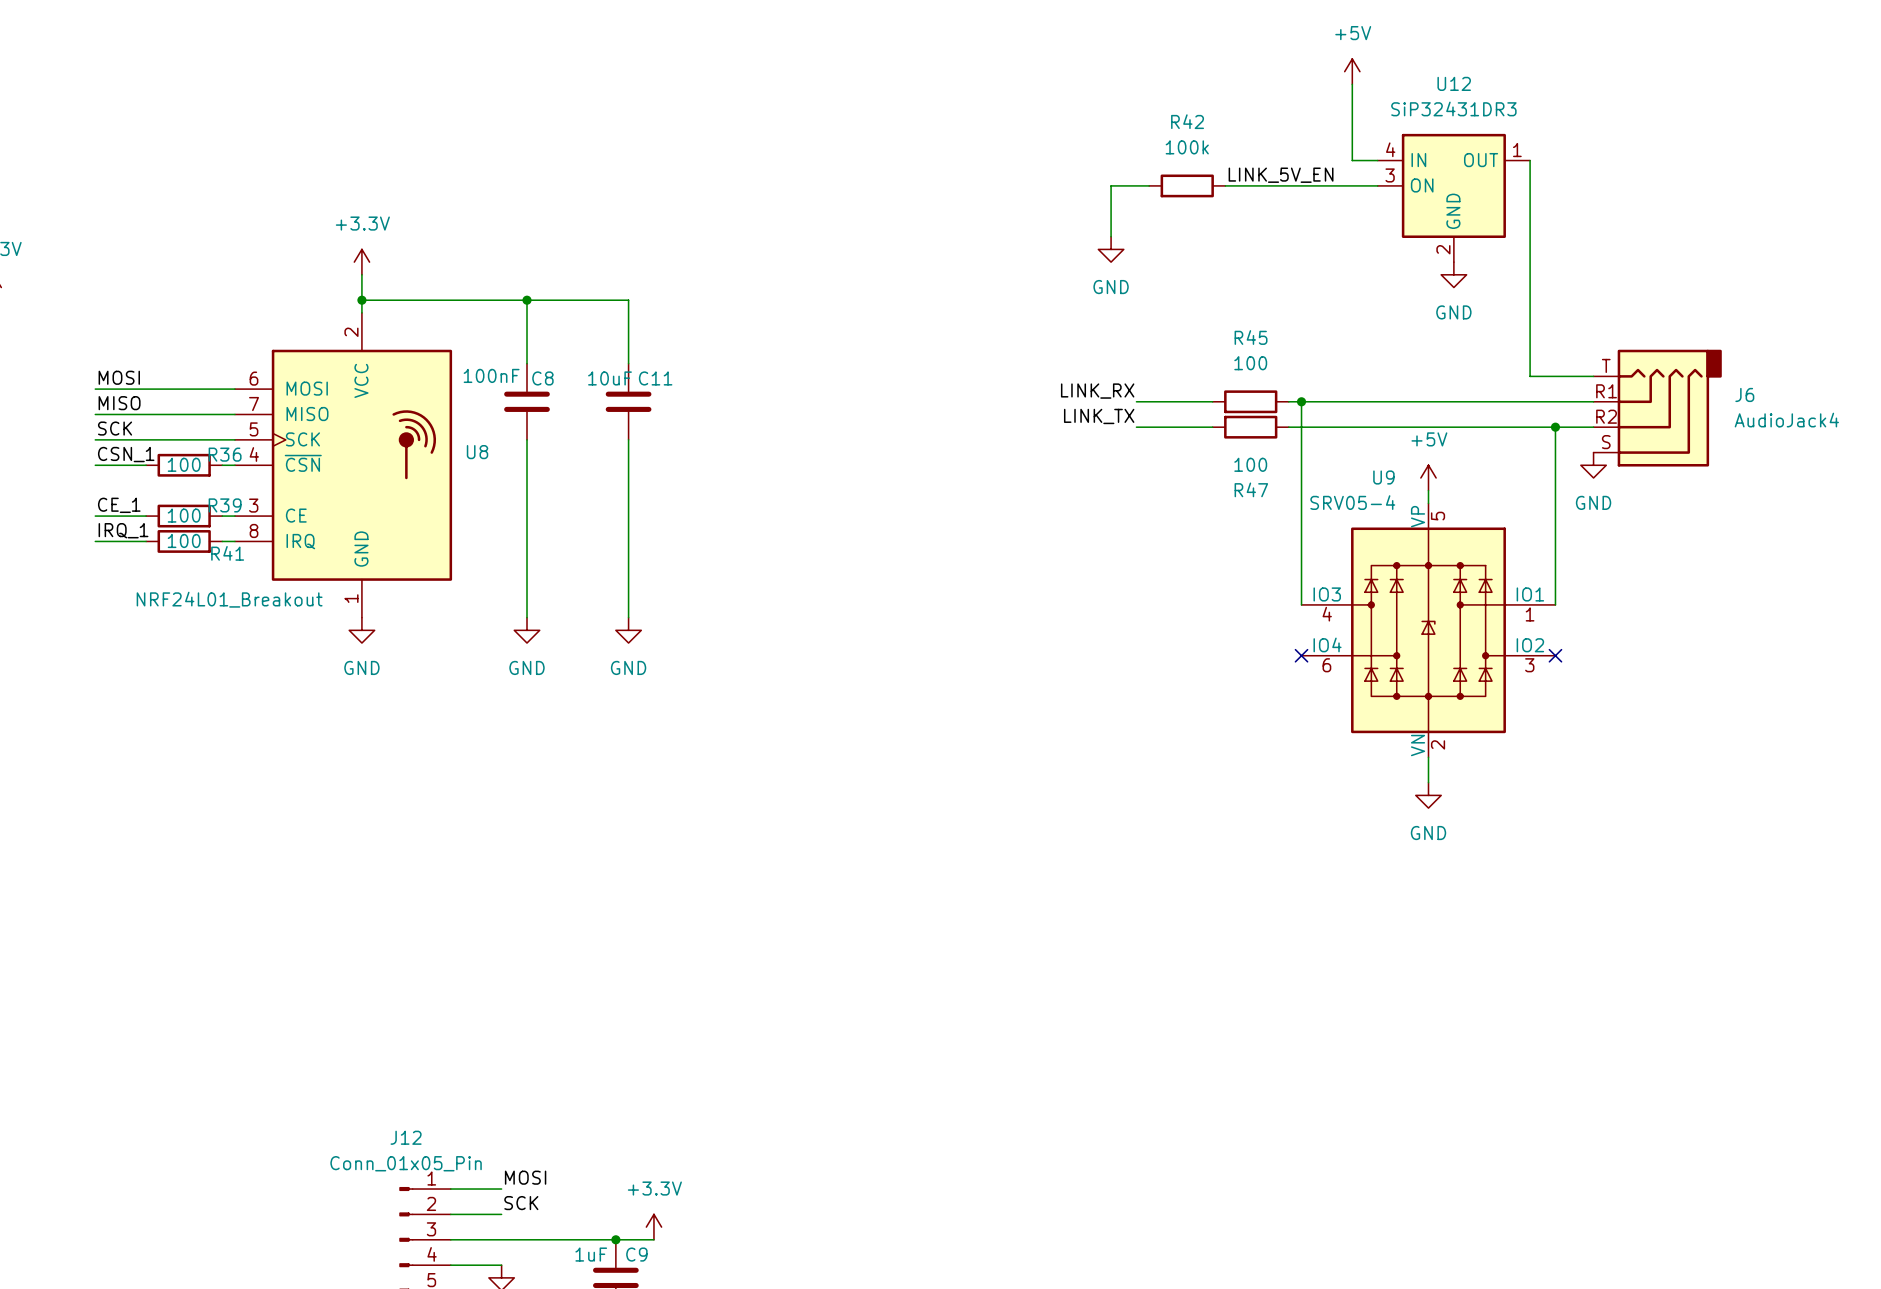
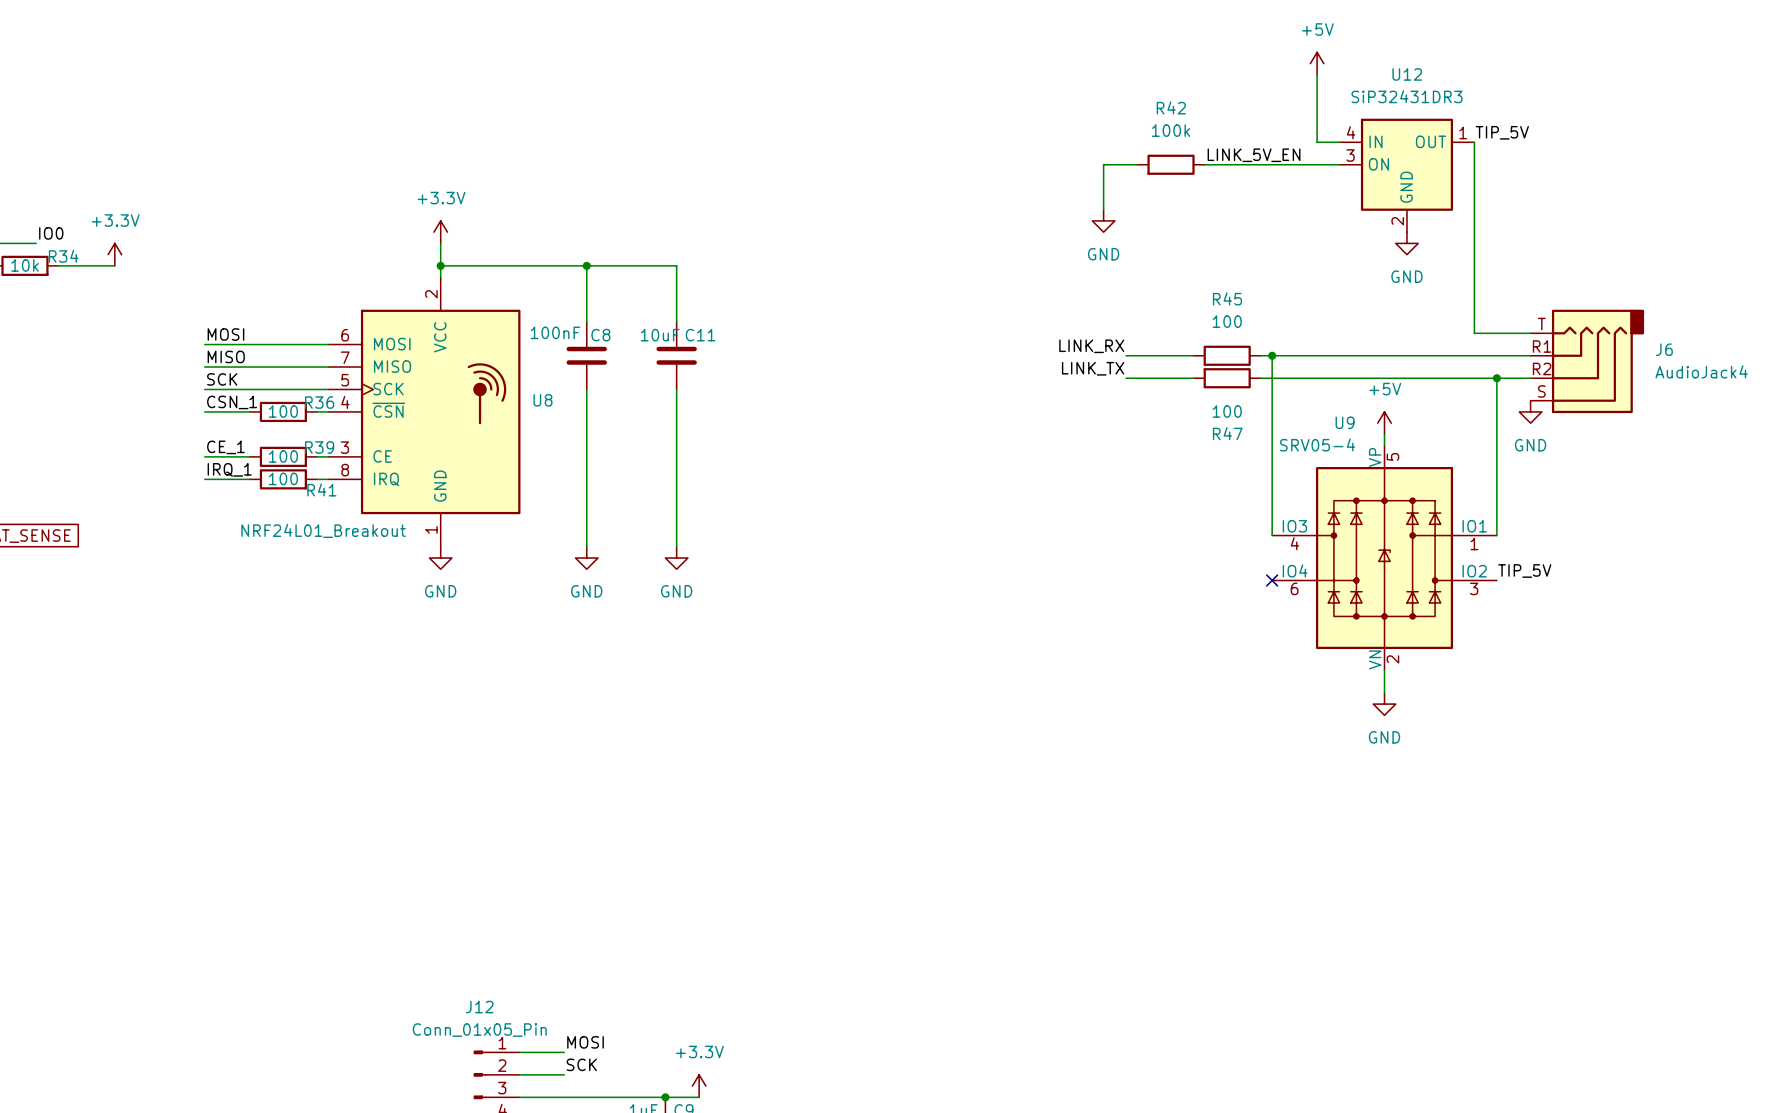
label: none -> TIP_5V (1502, 132)
label: none -> TIP_5V (1524, 570)
no-connect mark: (1555, 655) -> none

